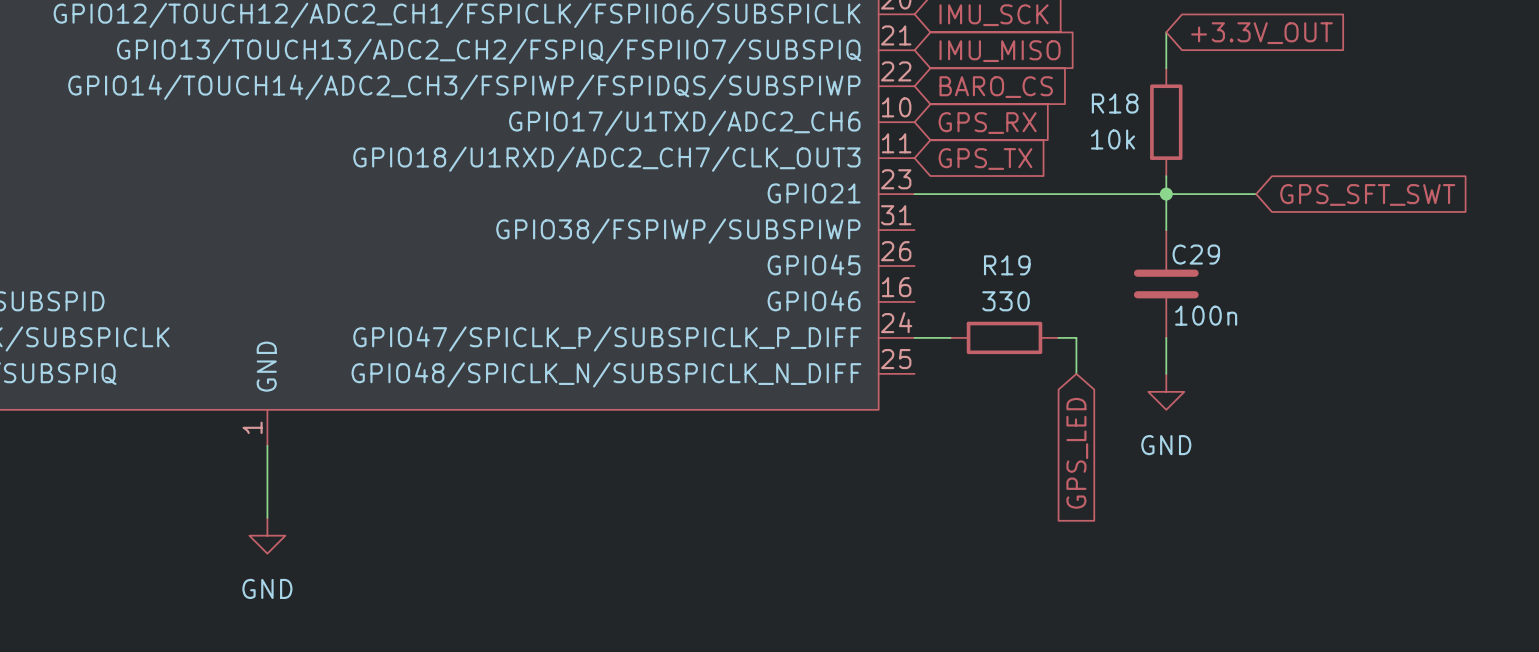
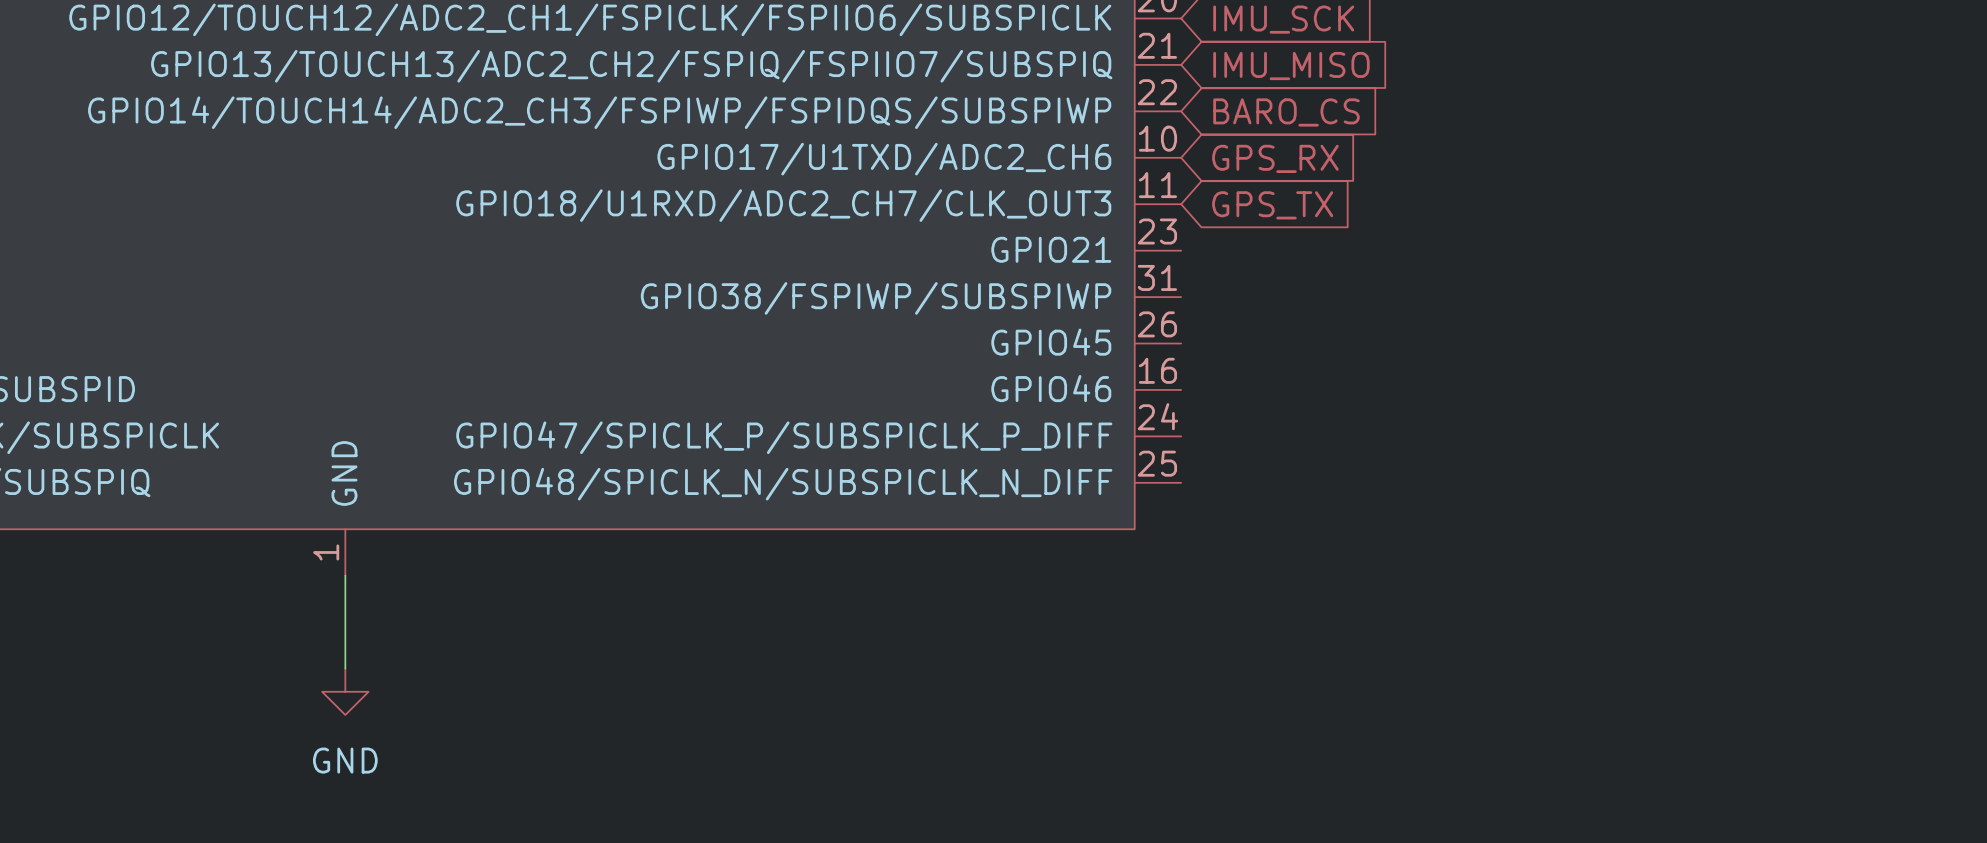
wire: (1166, 32) (1166, 68) -> none
global label: +3.3V_OUT (1262, 33) -> none
R18: 10k (1166, 122) -> none
wire: (1166, 176) (1166, 230) -> none
wire: (914, 194) (1256, 194) -> none
junction: (1166, 194) -> none
global label: GPS_SFT_SWT (1367, 194) -> none
C29: 100n (1166, 283) -> none
wire: (914, 337) (950, 337) -> none
R19: 330 (1004, 337) -> none
wire: (1058, 337) (1076, 337) (1076, 373) -> none
wire: (1166, 337) (1166, 373) -> none
power symbol: GND (1166, 391) -> none
global label: GPS_LED (1077, 453) -> none

